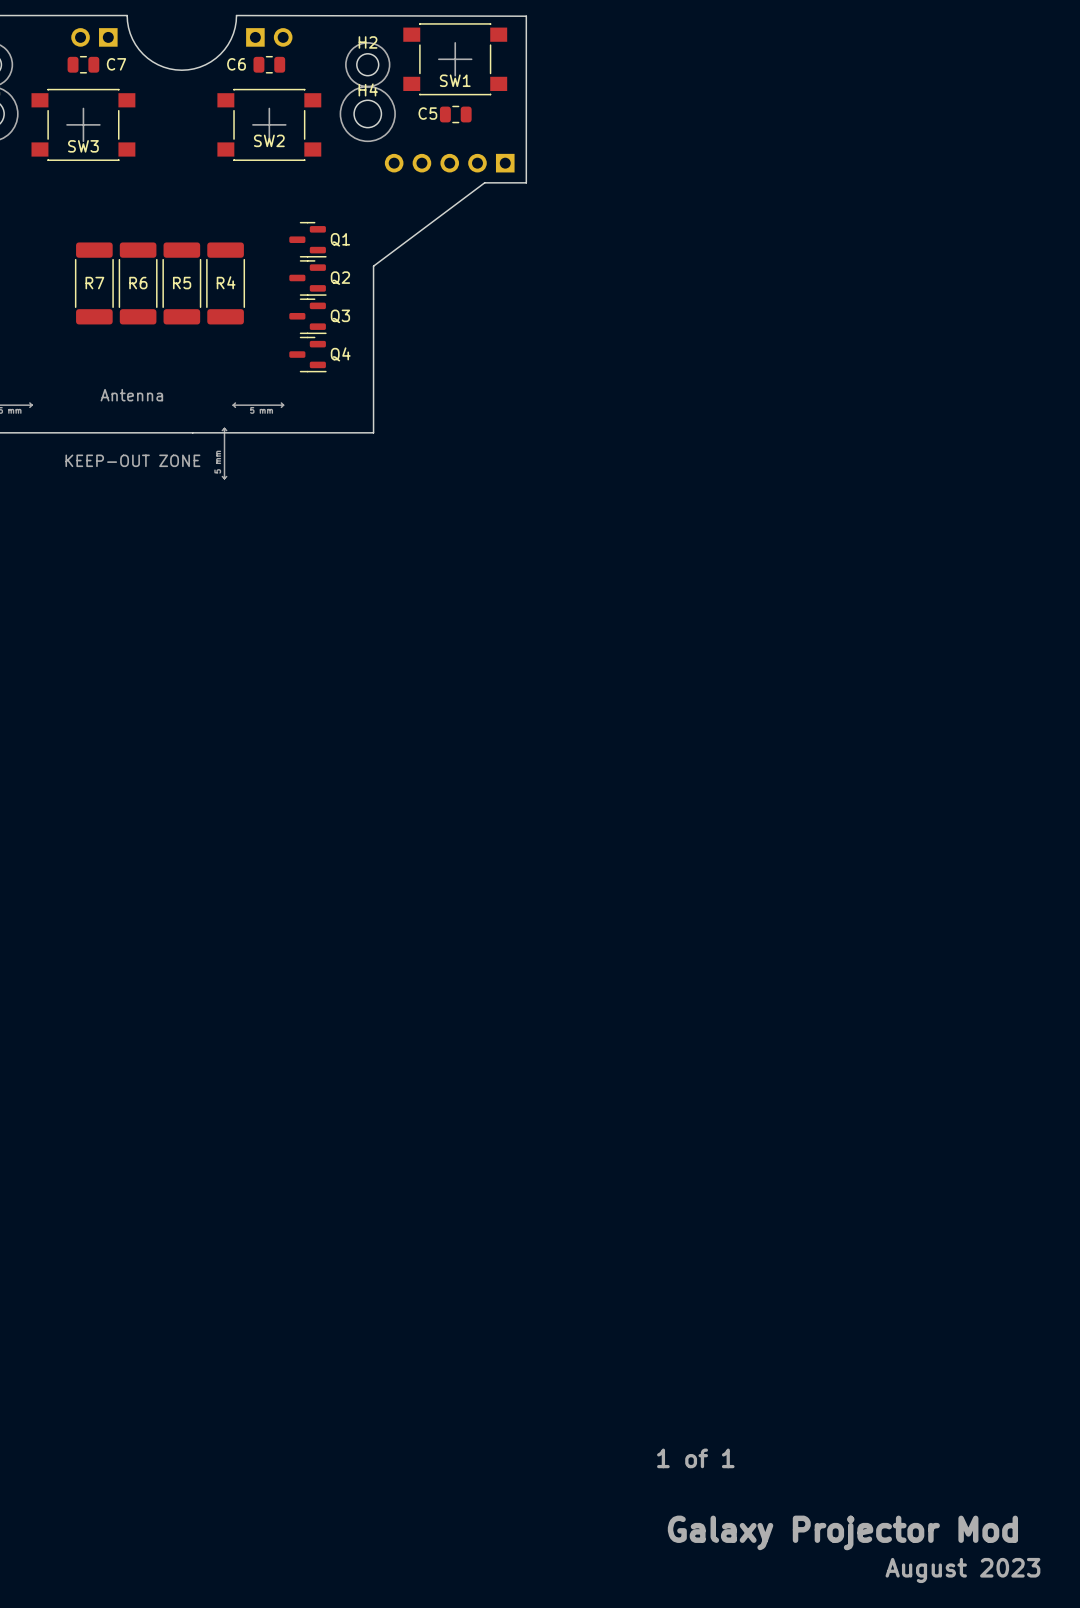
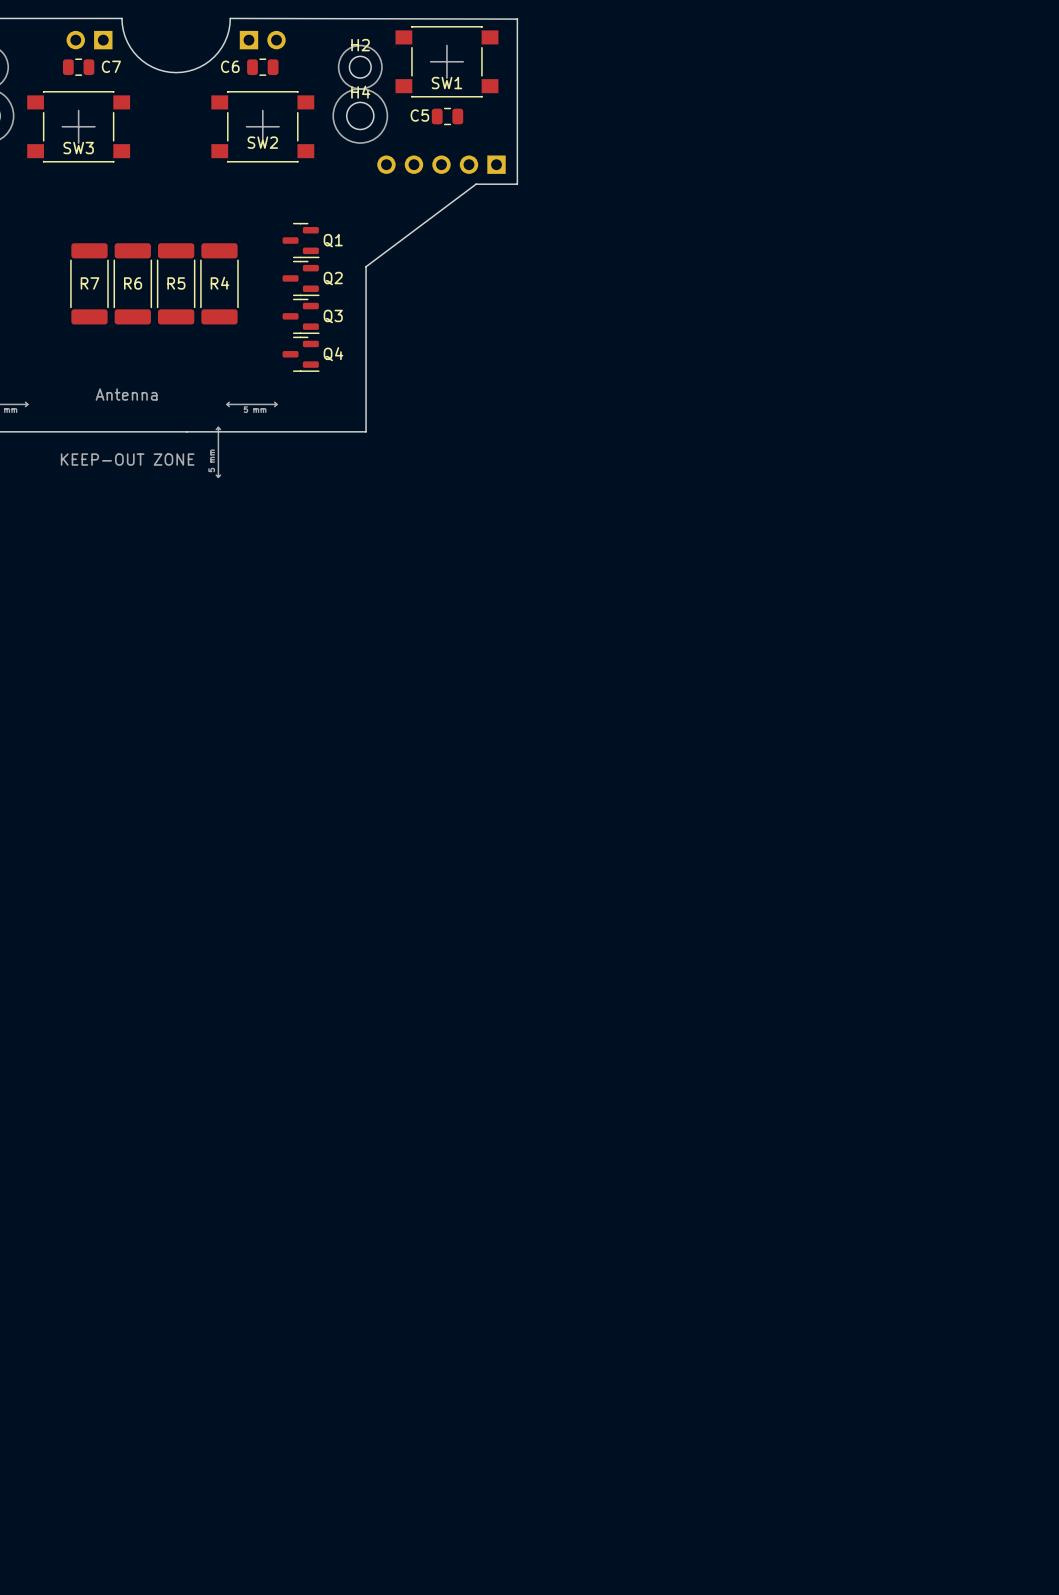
text: 1 of 1 (695, 1458) -> none
text: Galaxy Projector Mod (842, 1532) -> none
text: August 2023 (962, 1570) -> none

